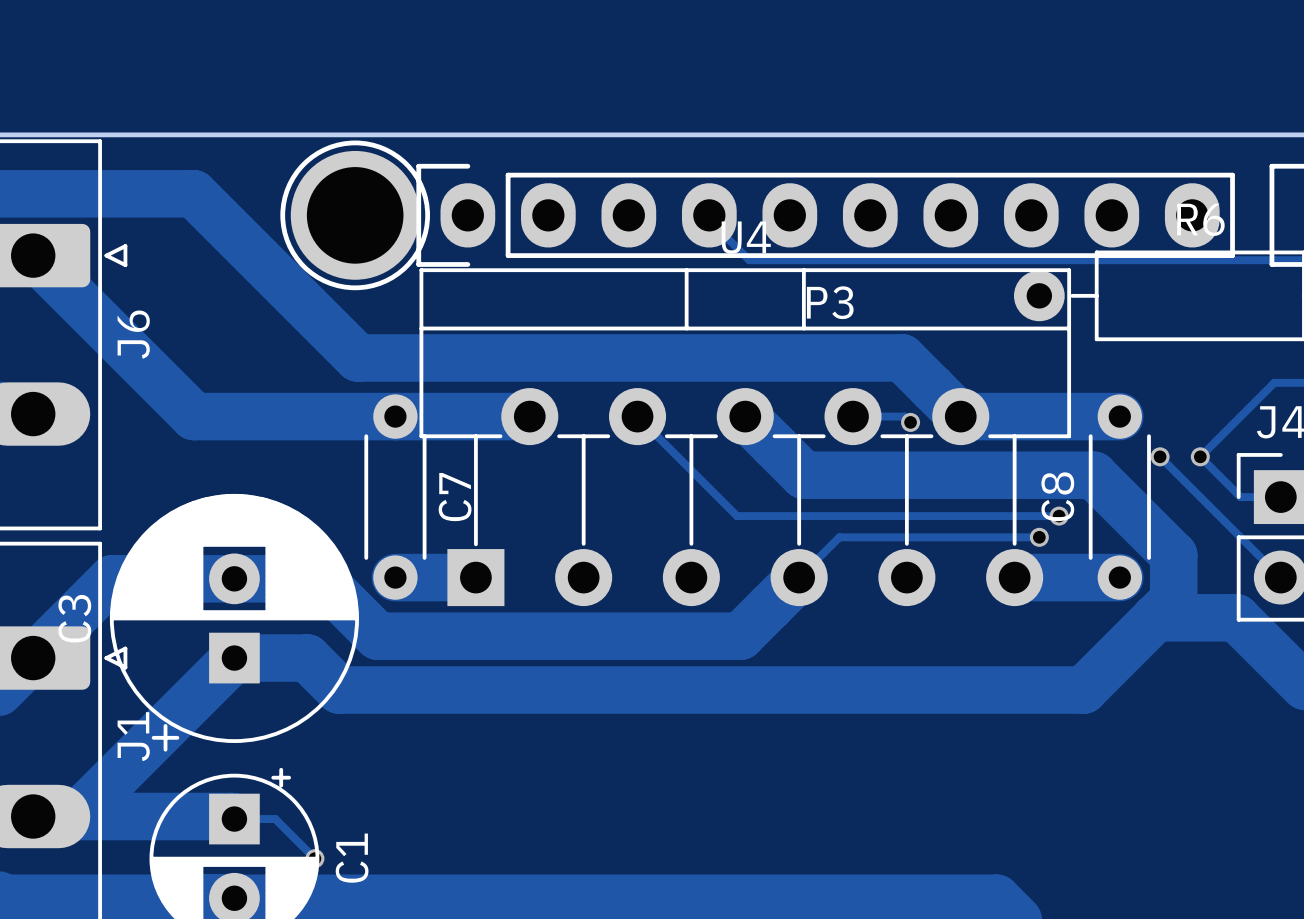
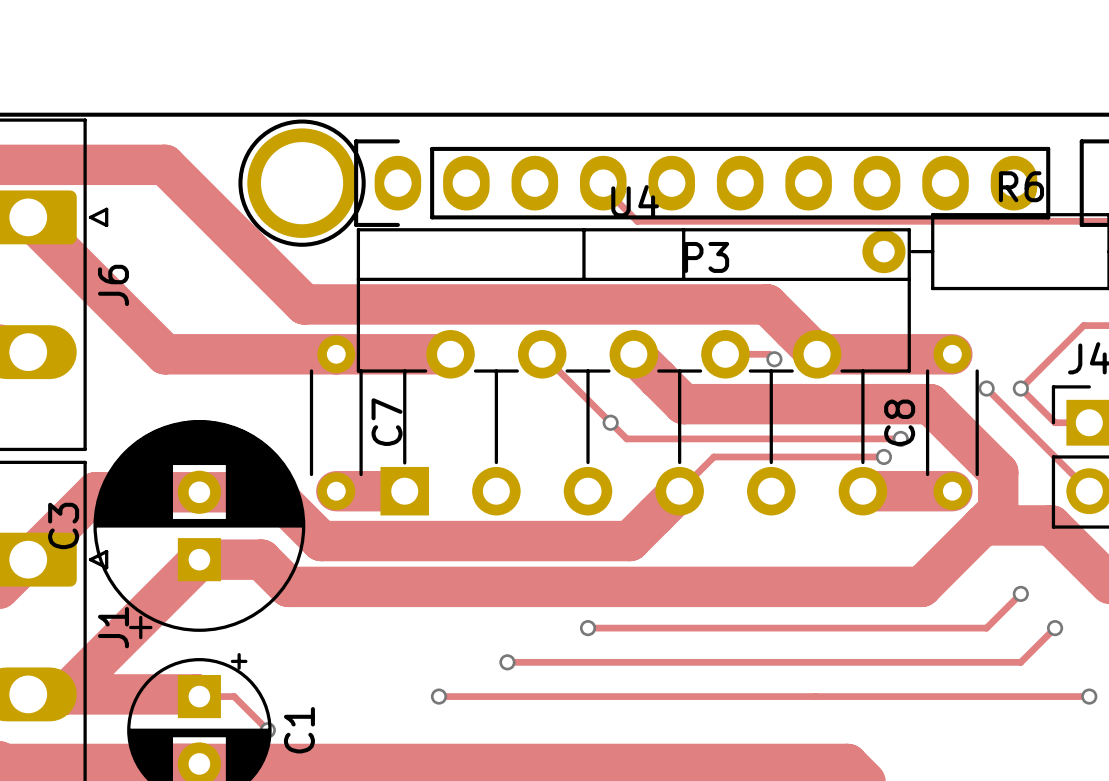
via: none -> (610, 422)
track: none -> (1020, 593) (986, 628) (588, 628)
via: none -> (1020, 593)
via: none -> (588, 628)
track: none -> (1055, 628) (1020, 662) (507, 662)
via: none -> (1055, 628)
via: none -> (507, 662)
track: none -> (438, 696) (1089, 696)
via: none -> (438, 696)
via: none -> (1089, 696)

